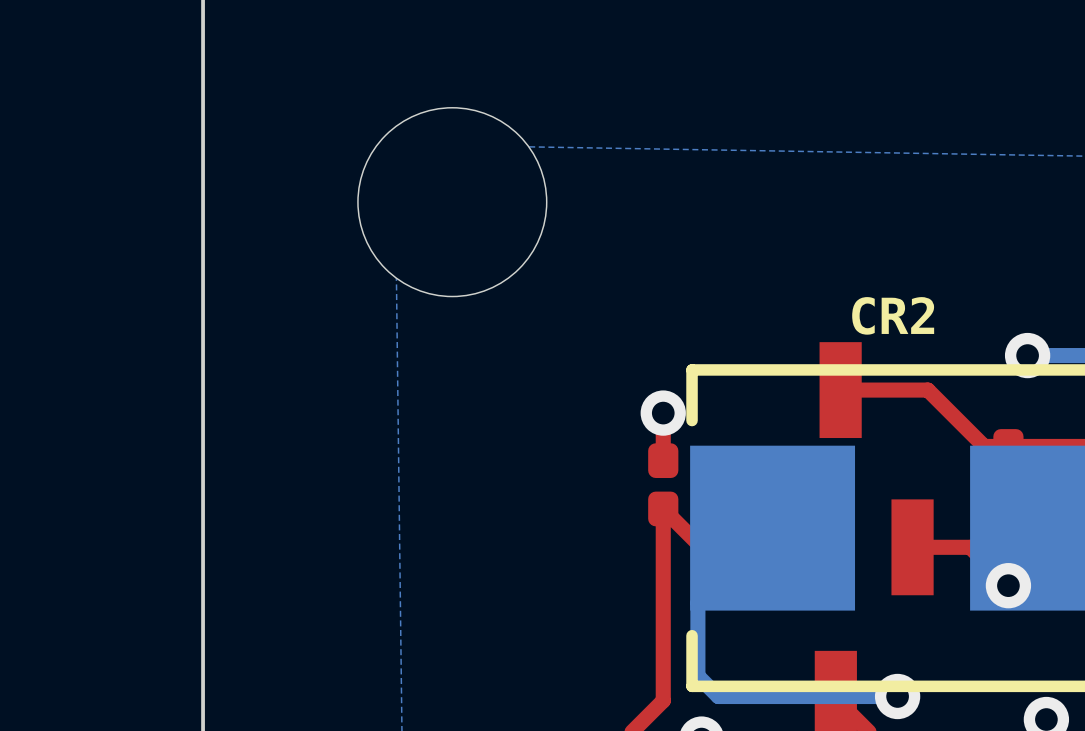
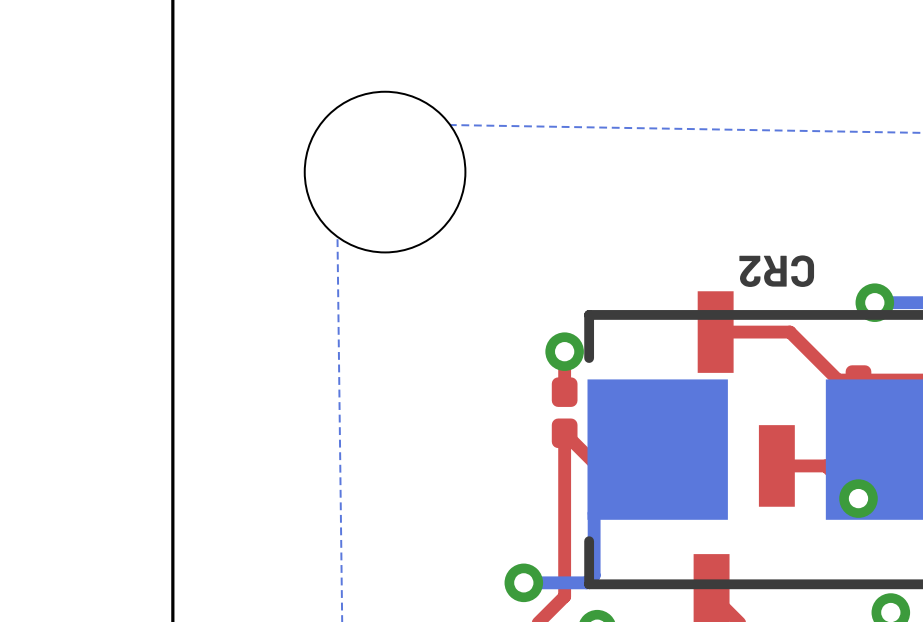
CR2 name rotation: 0° (893, 315) -> 180° (776, 271)
bottom track: (697, 676) (718, 696) (897, 696) -> (594, 575) (586, 582) (523, 582)
via position: (897, 696) -> (523, 582)

